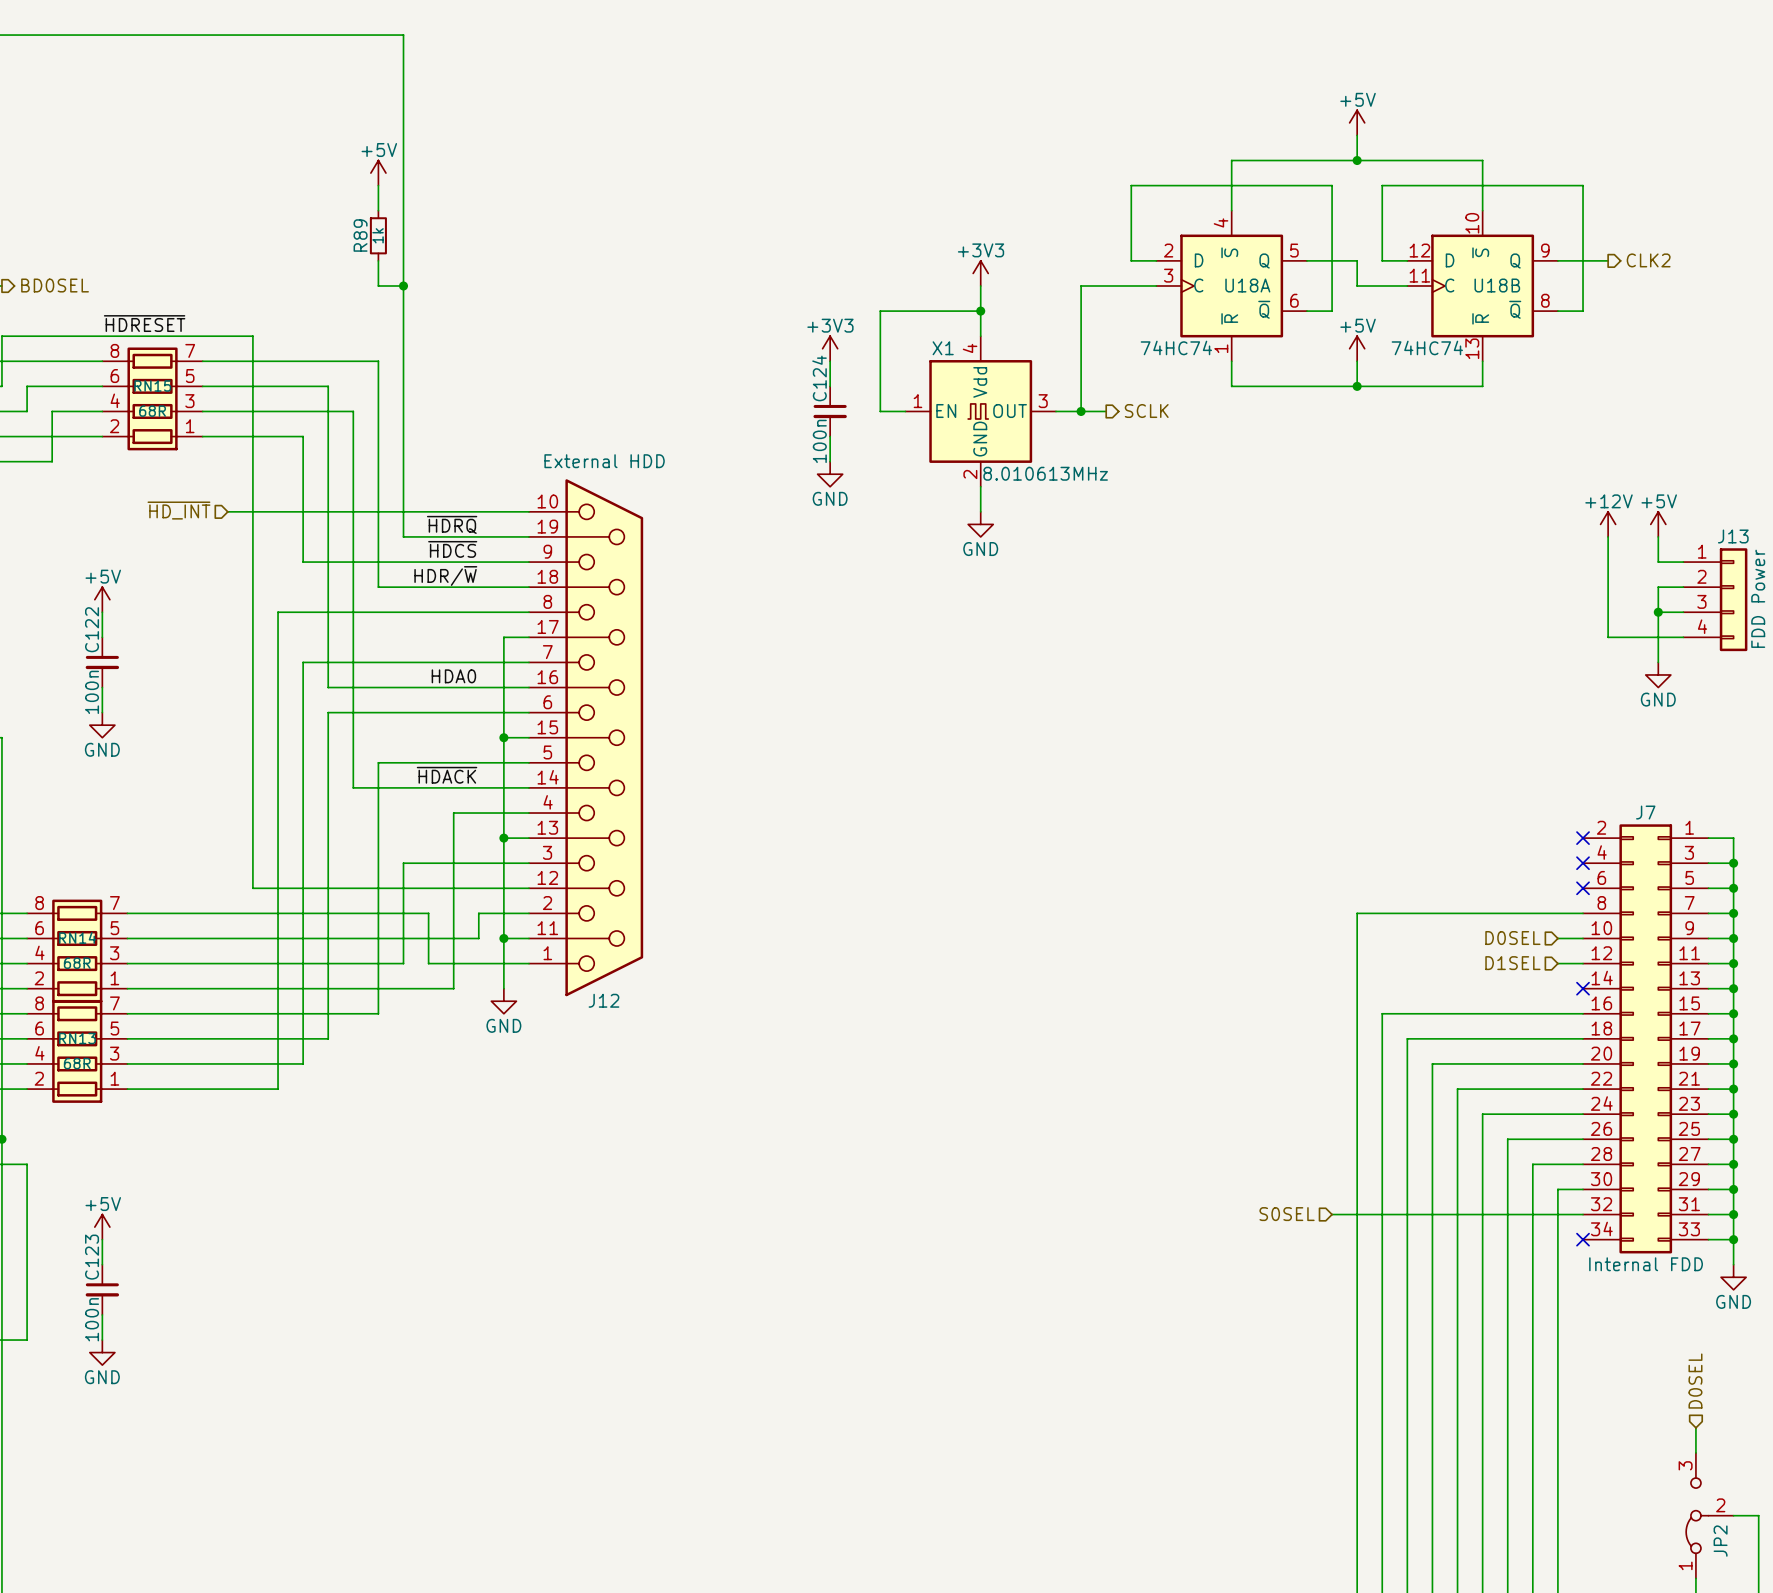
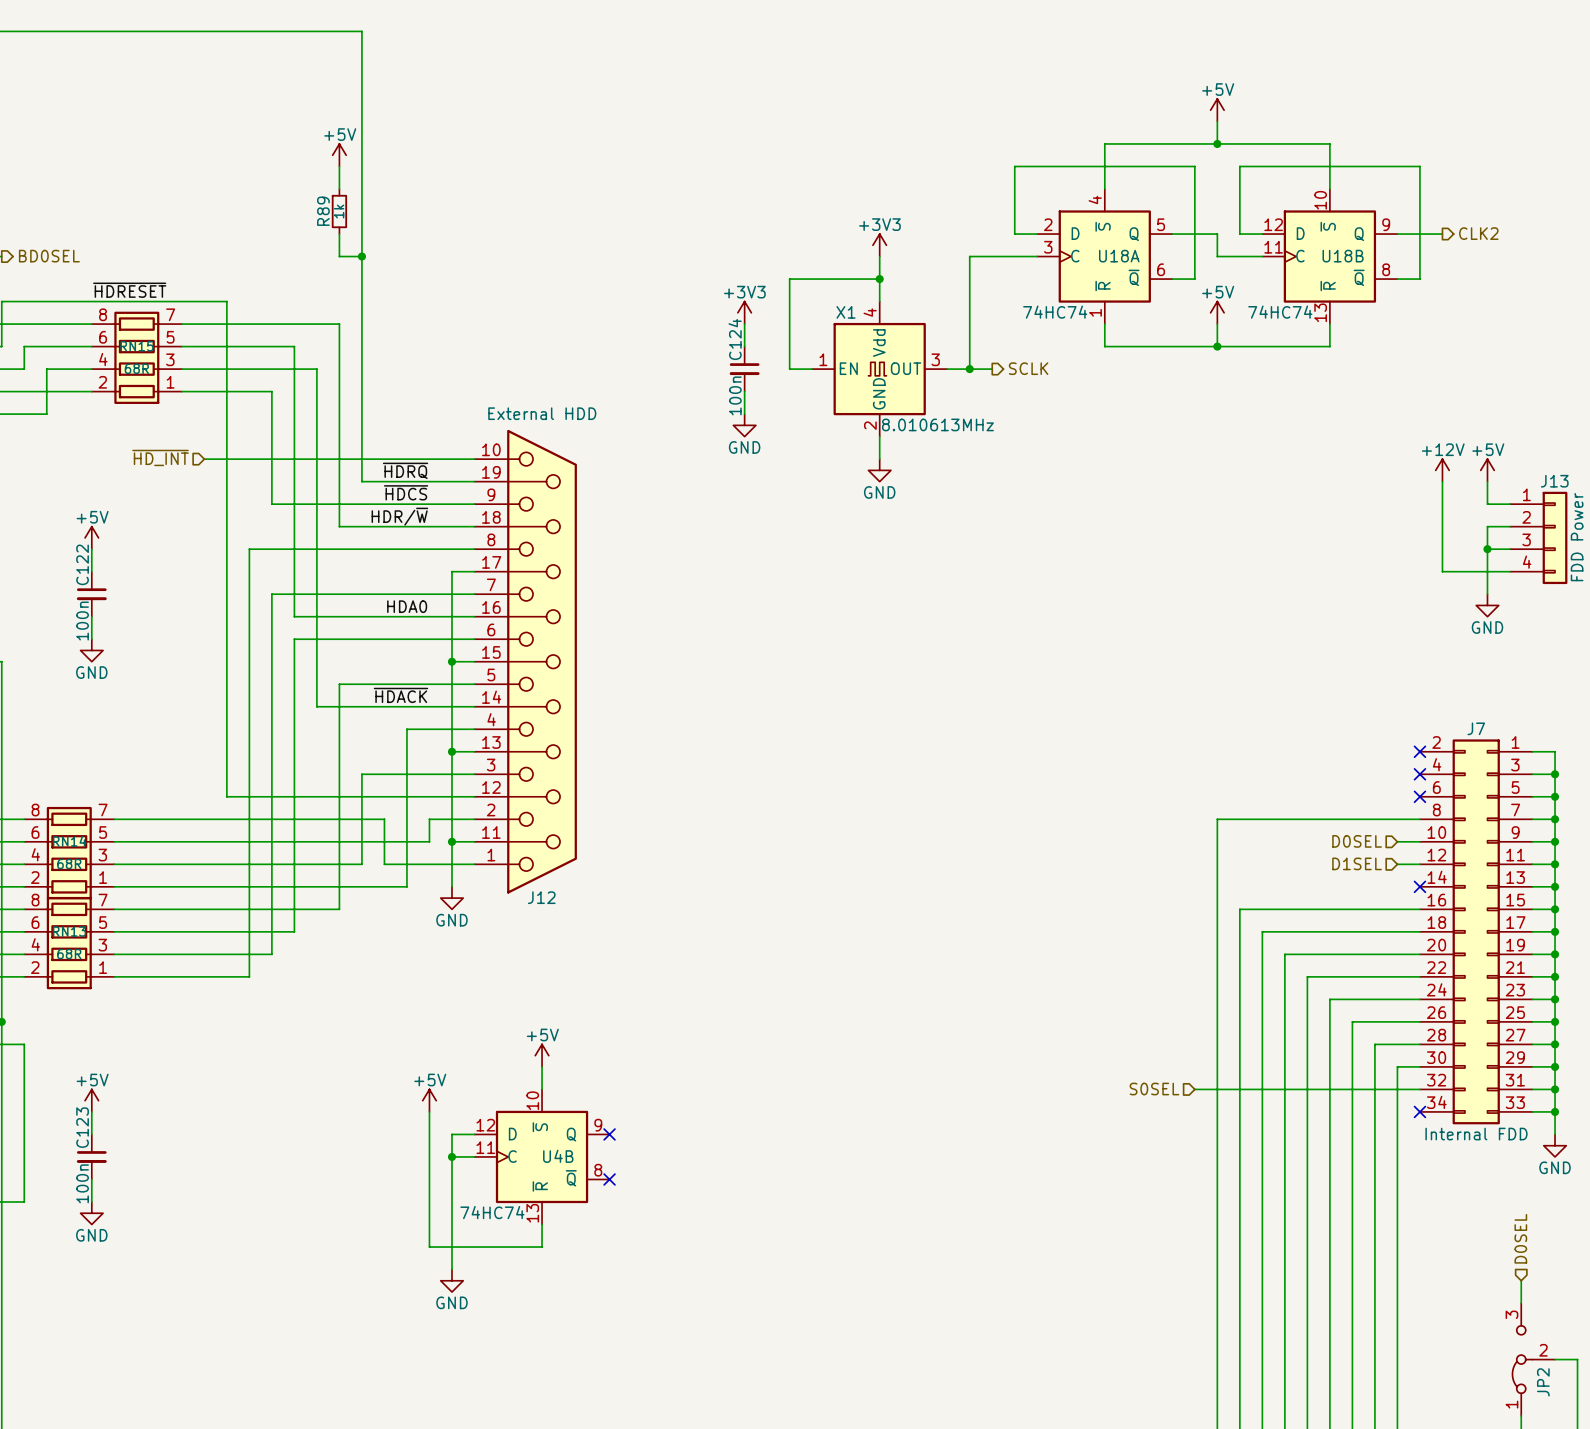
power symbol: none -> +5V (542, 1055)
wire: none -> (542, 1066) (542, 1089)
power symbol: none -> +5V (429, 1100)
wire: none -> (429, 1111) (429, 1247) (542, 1247) (542, 1224)
wire: none -> (474, 1134) (451, 1134) (451, 1269)
no-connect mark: none -> (609, 1134)
wire: none -> (451, 1156) (474, 1156)
junction: none -> (451, 1156)
U4B: none -> 74HC74 (542, 1156)
no-connect mark: none -> (609, 1179)
power symbol: none -> GND (451, 1280)

